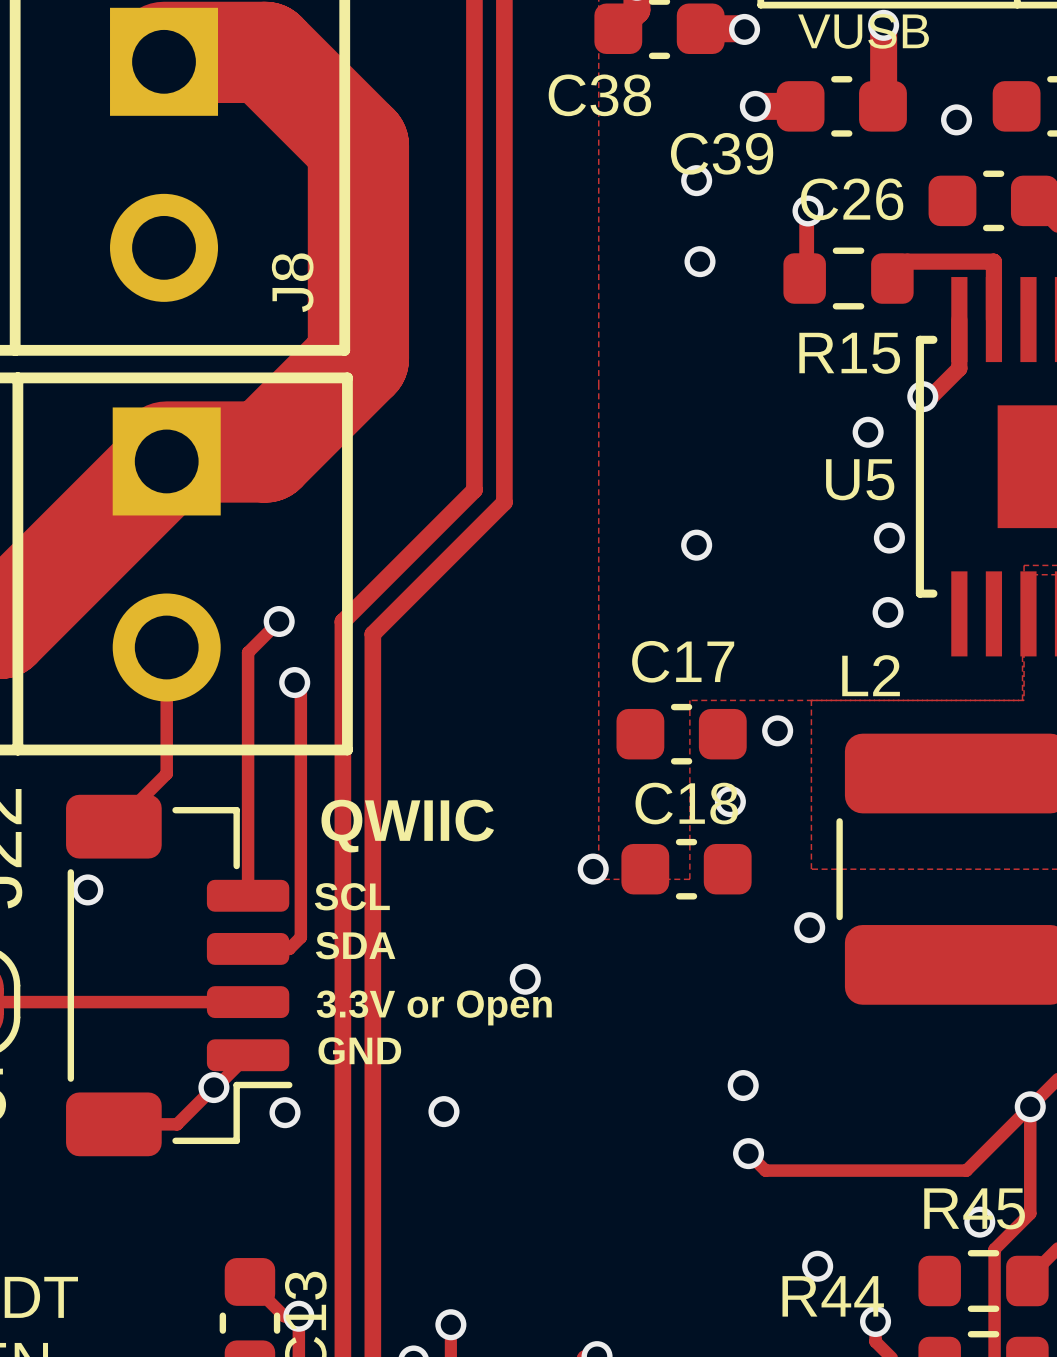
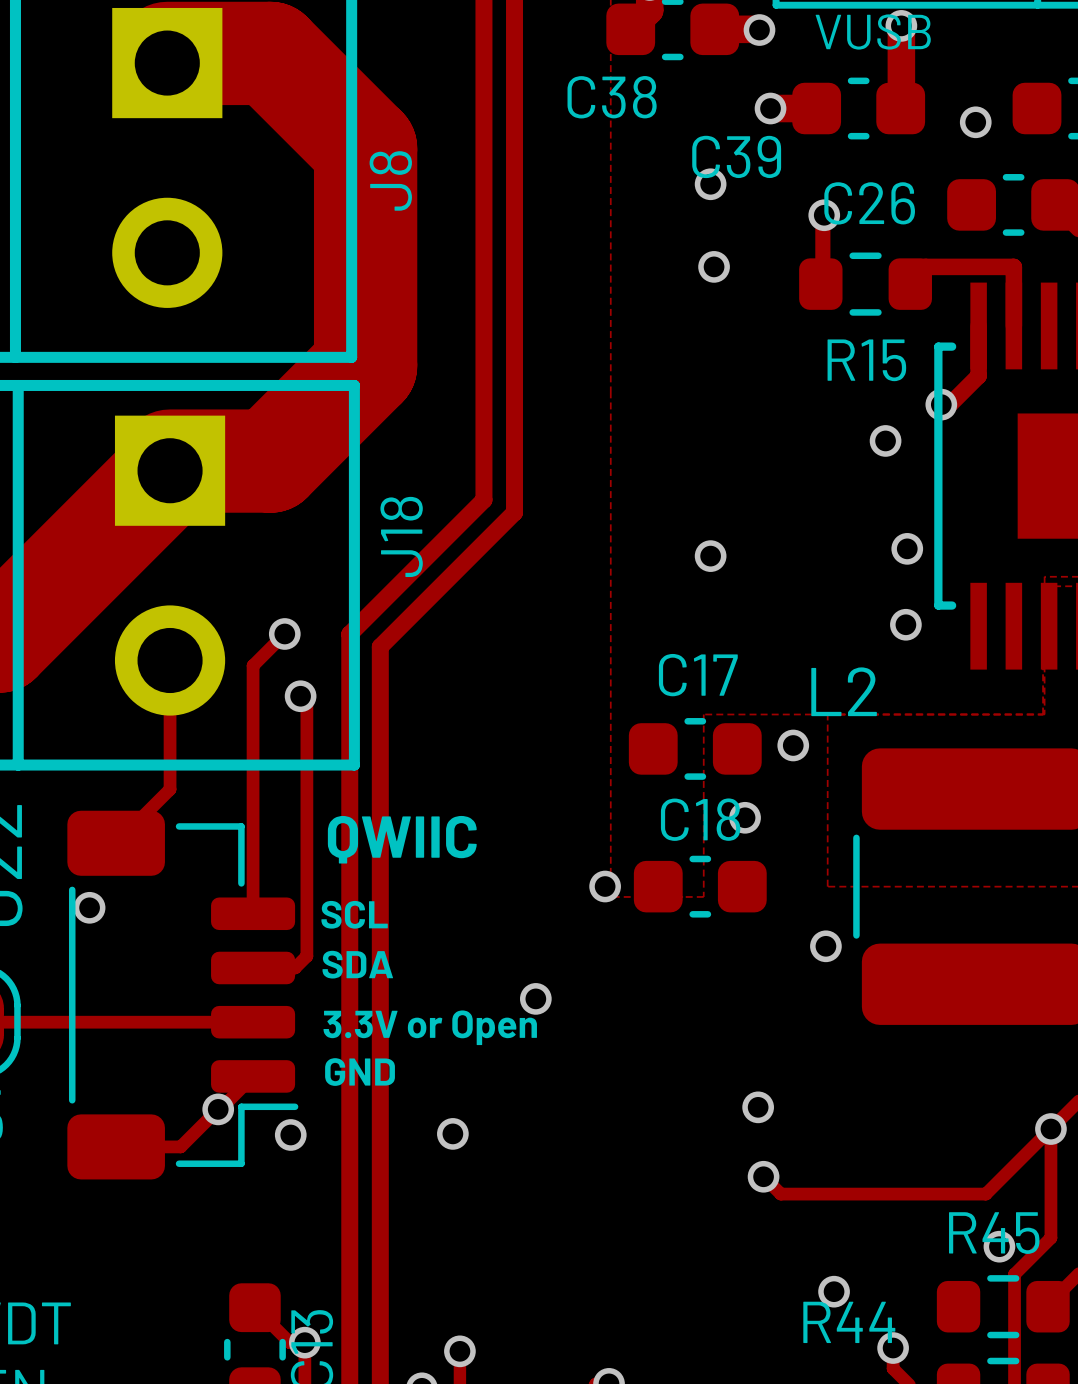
J8 name position: J8 (292, 282) -> J8 (390, 180)
U5 name: U5 (860, 479) -> none
J18 name: none -> J18 (401, 536)
L2 name position: L2 (871, 675) -> L2 (844, 691)

